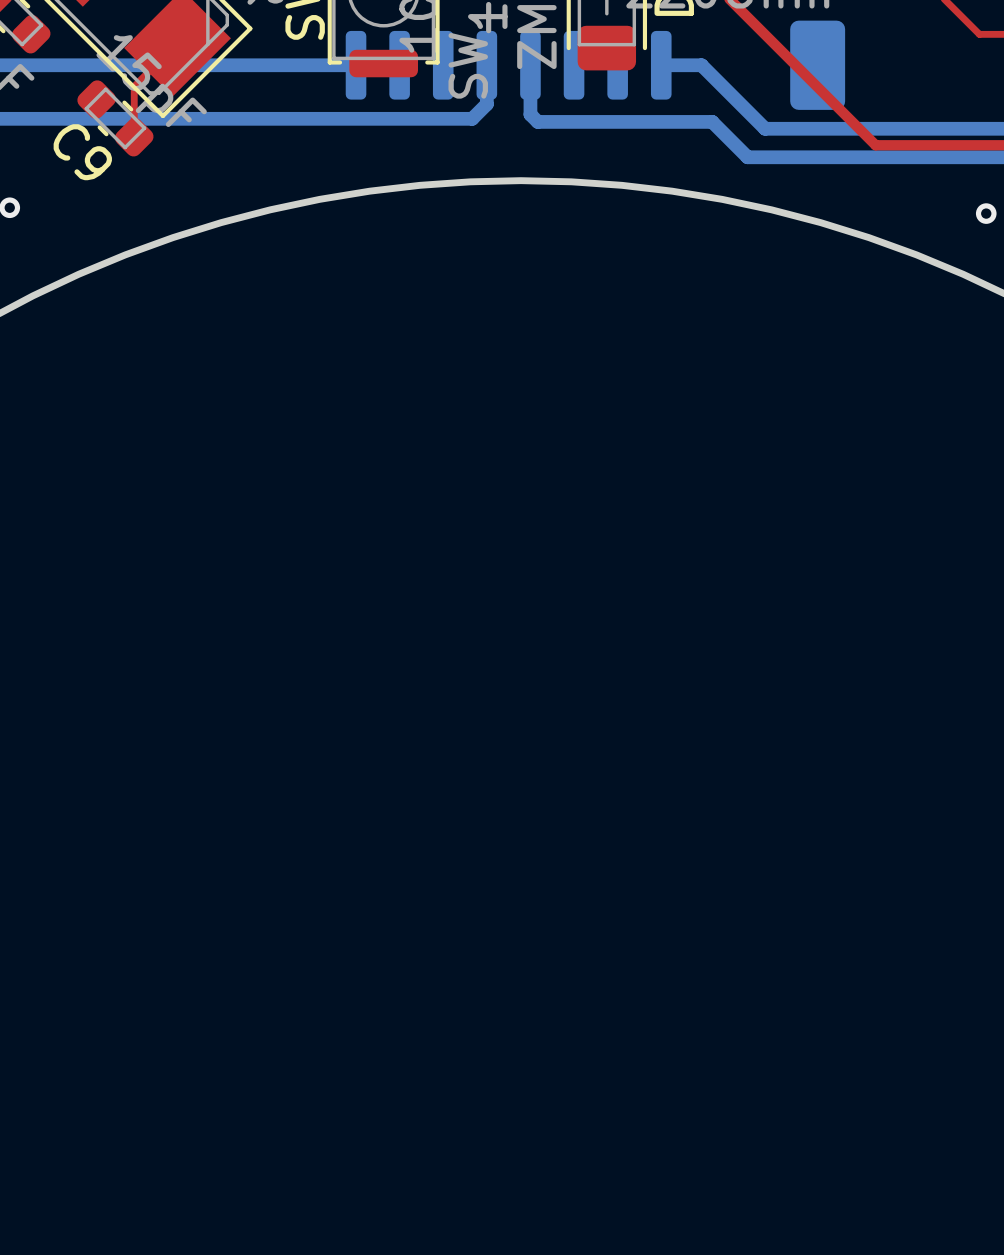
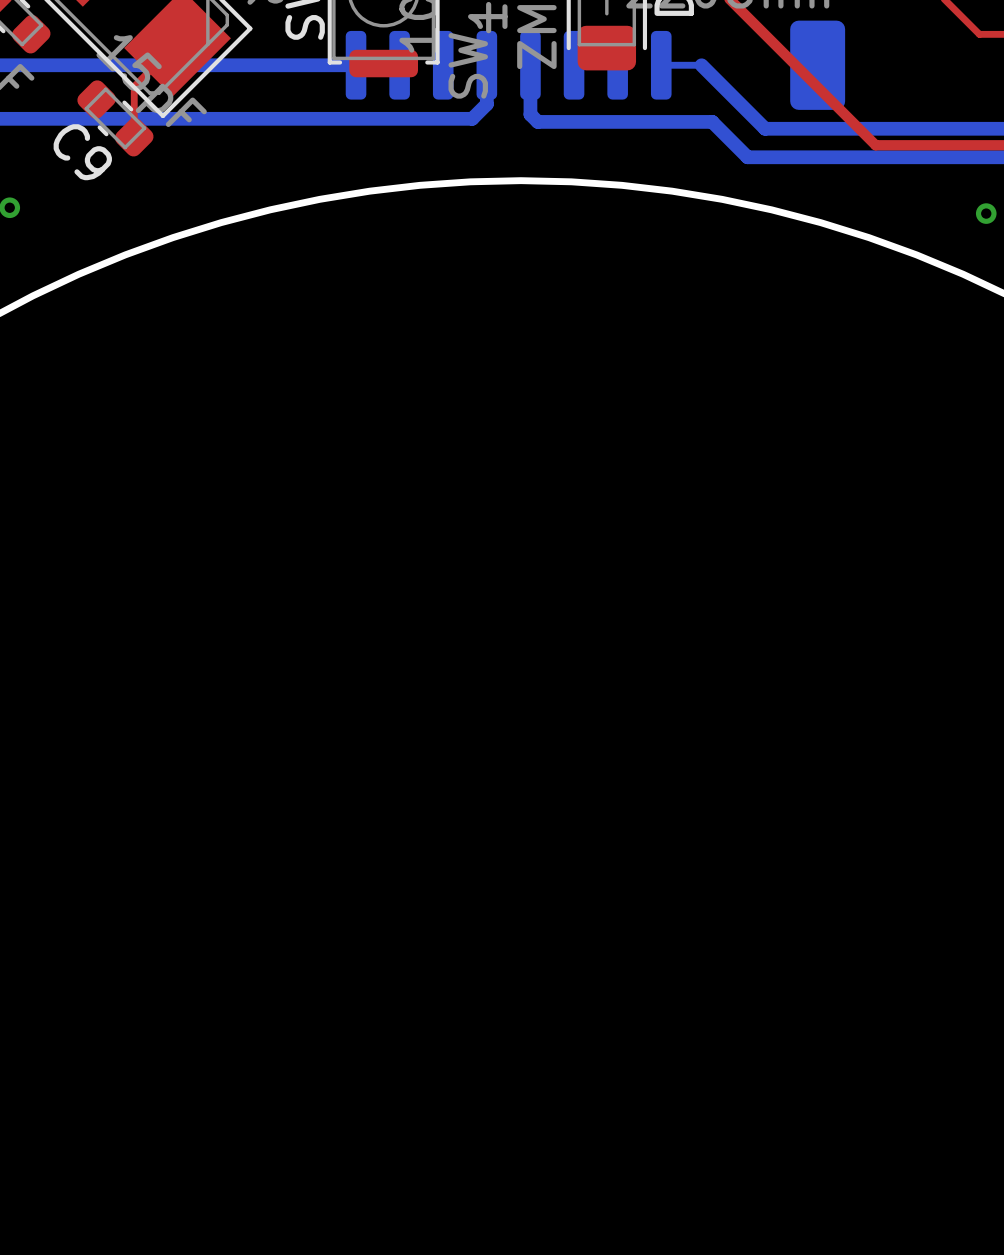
bottom track width: thick (661, 65) (701, 65) -> thin (661, 65) (701, 65)

